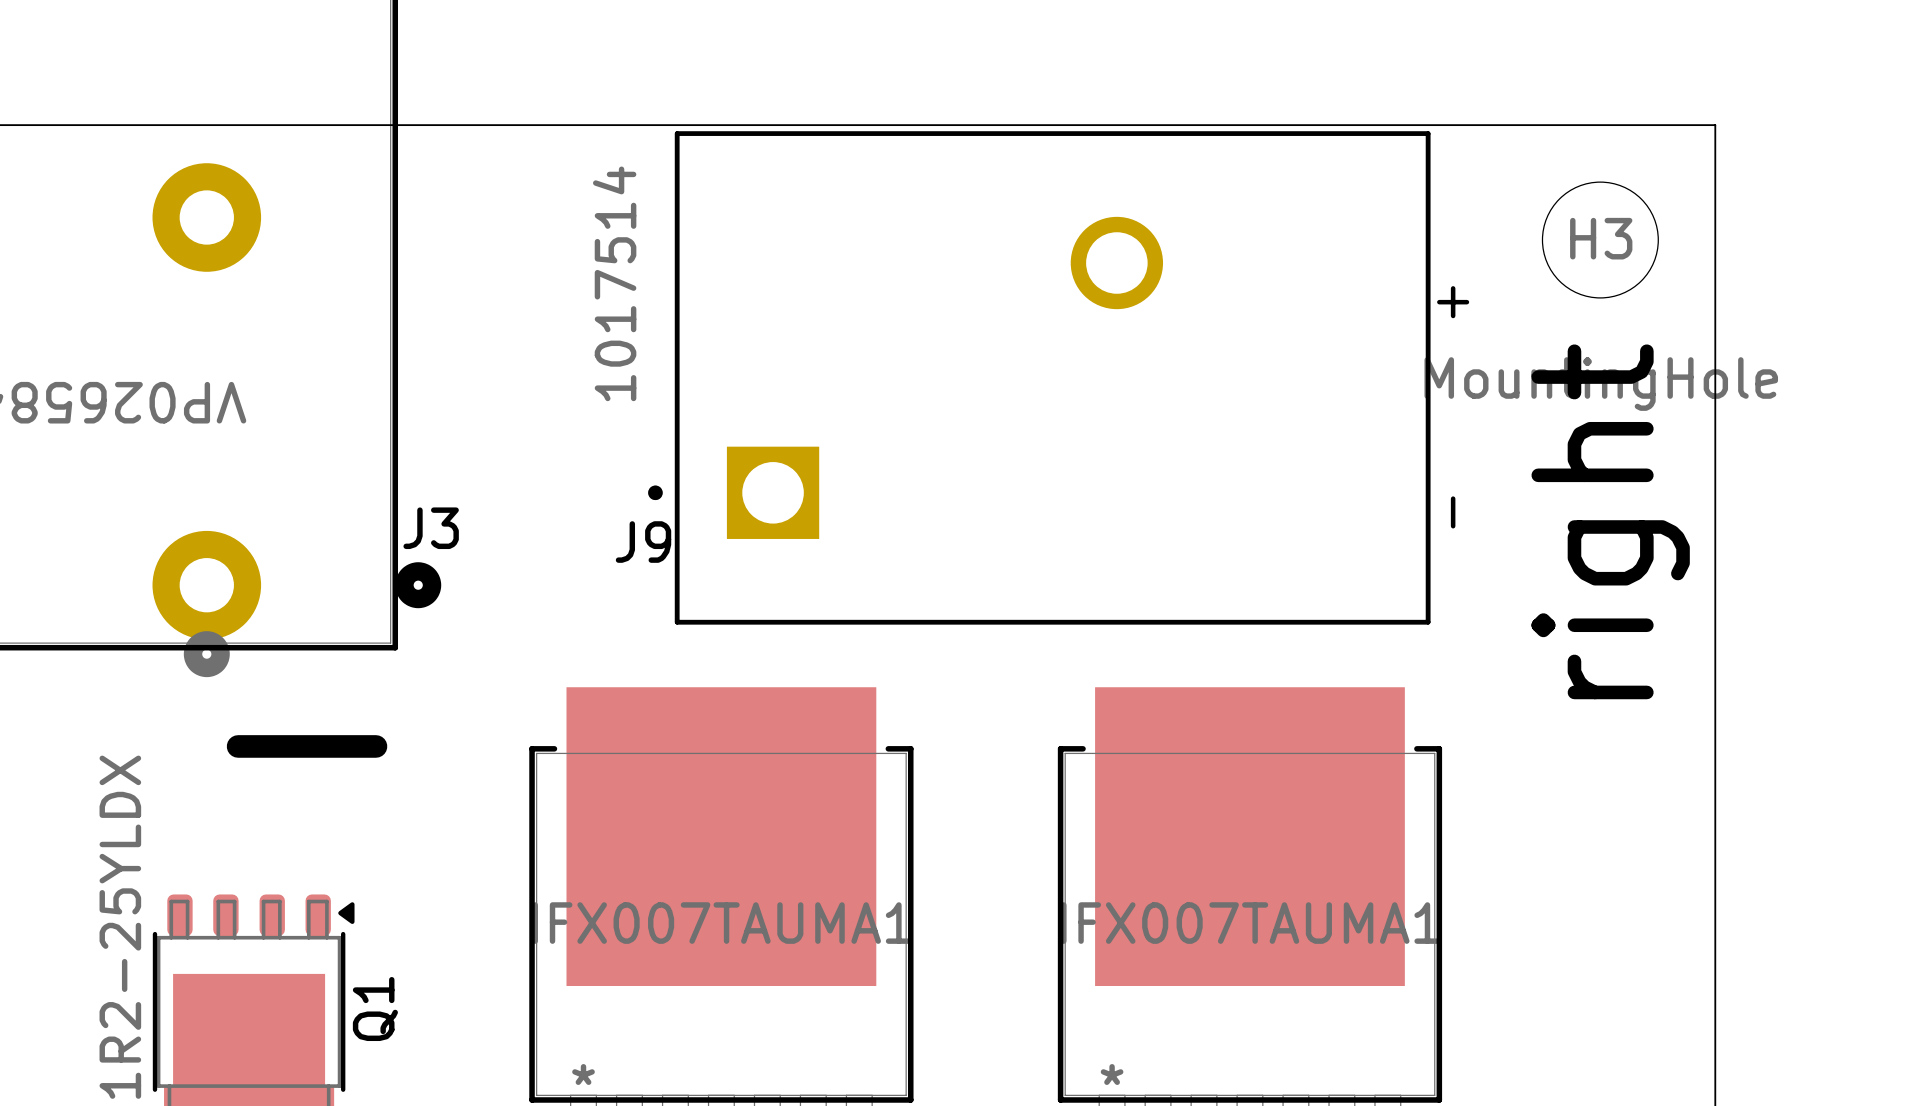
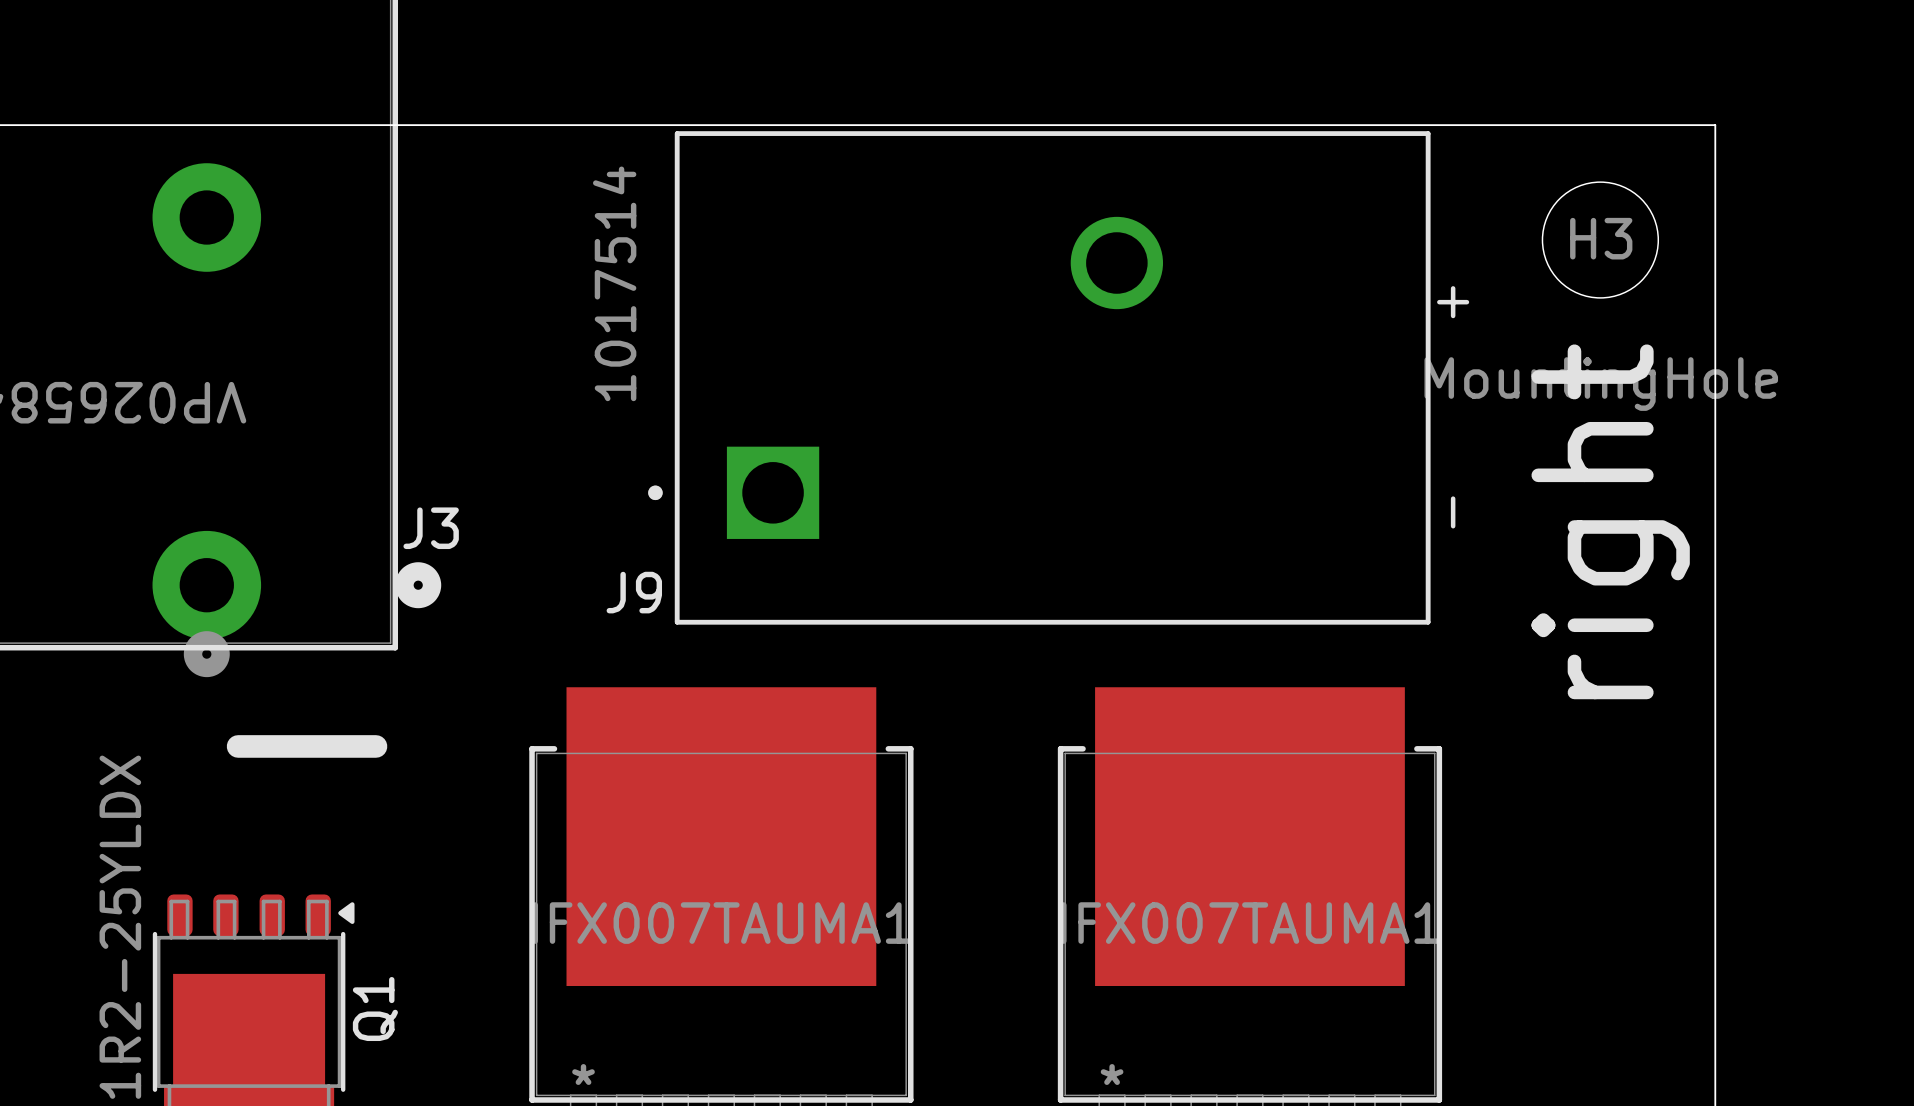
J9 name position: J9 (643, 542) -> J9 (634, 592)

